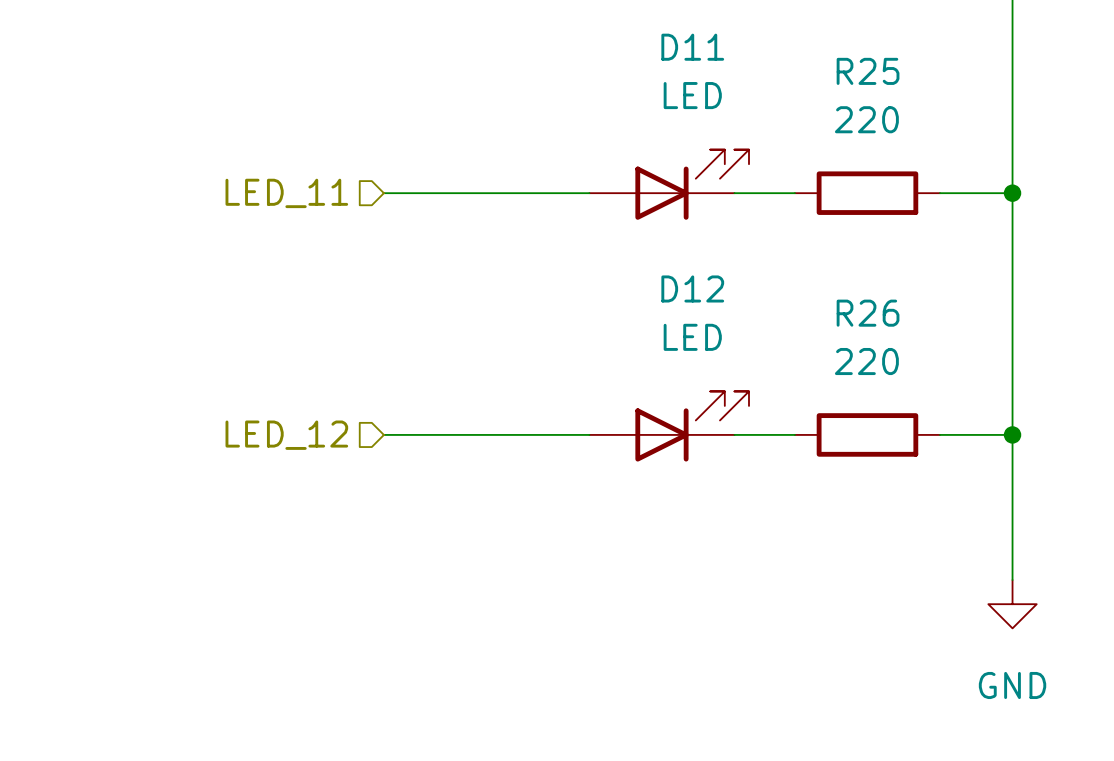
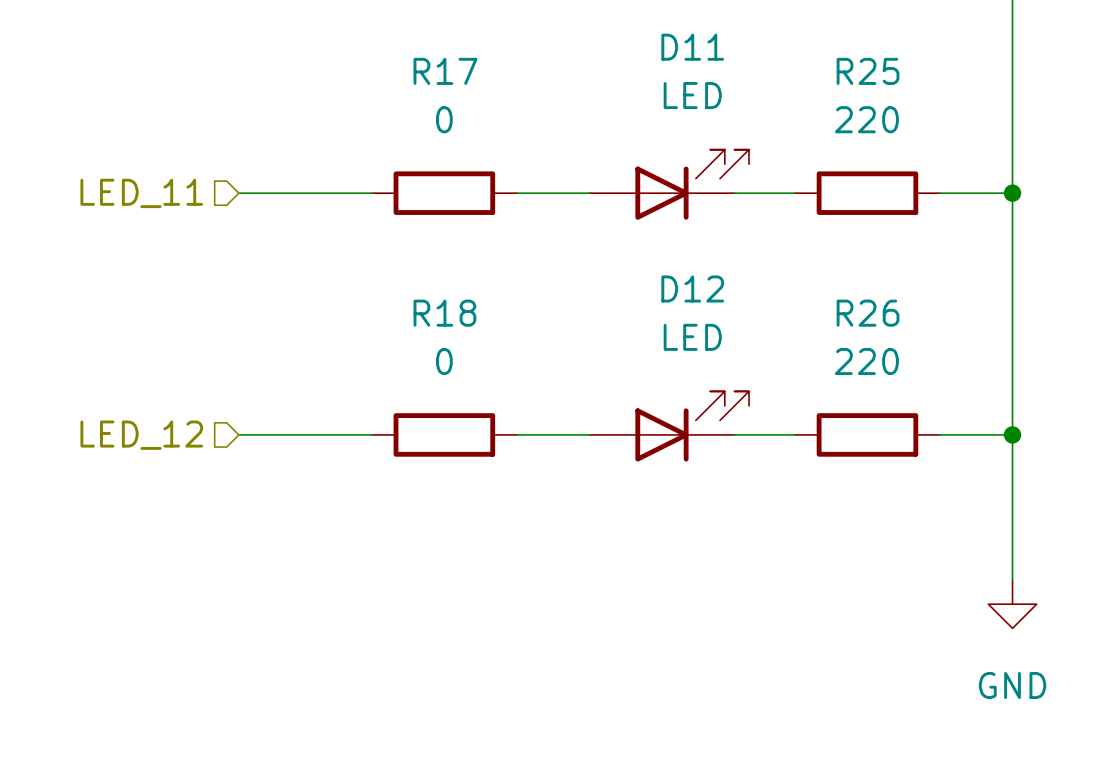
hierarchical label position: LED_11 (286, 193) -> LED_11 (141, 193)
wire: (383, 193) (516, 193) -> (238, 193) (371, 193)
R17: none -> 0 (444, 193)
wire: (383, 434) (516, 434) -> (238, 434) (371, 434)
R18: none -> 0 (444, 434)
hierarchical label position: LED_12 (286, 435) -> LED_12 (141, 435)

